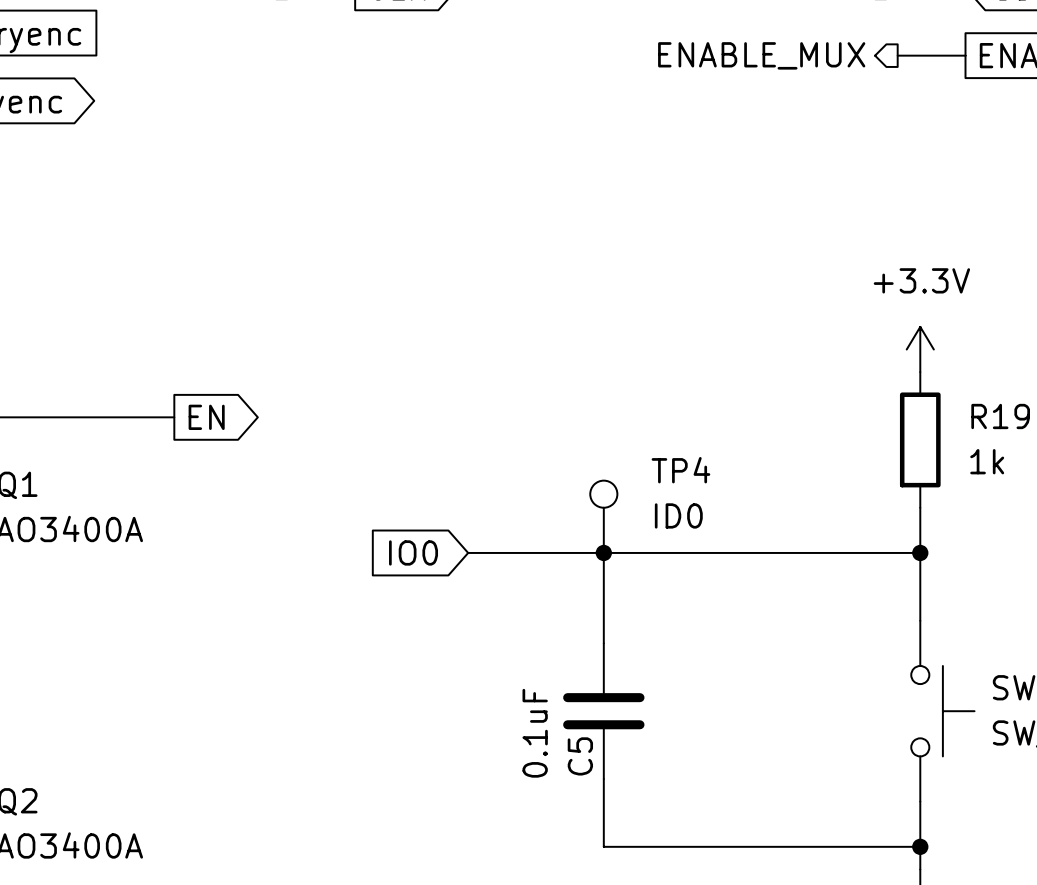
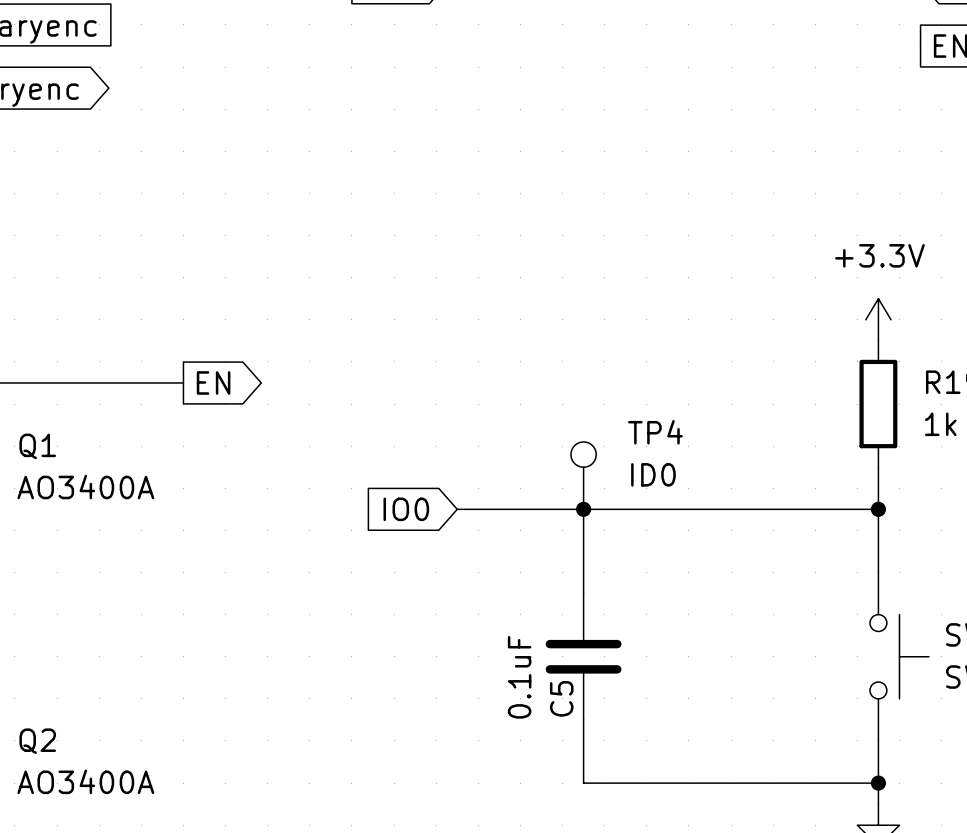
hierarchical label: ENABLE_MUX (761, 55) -> none
wire: (897, 55) (965, 55) -> none

